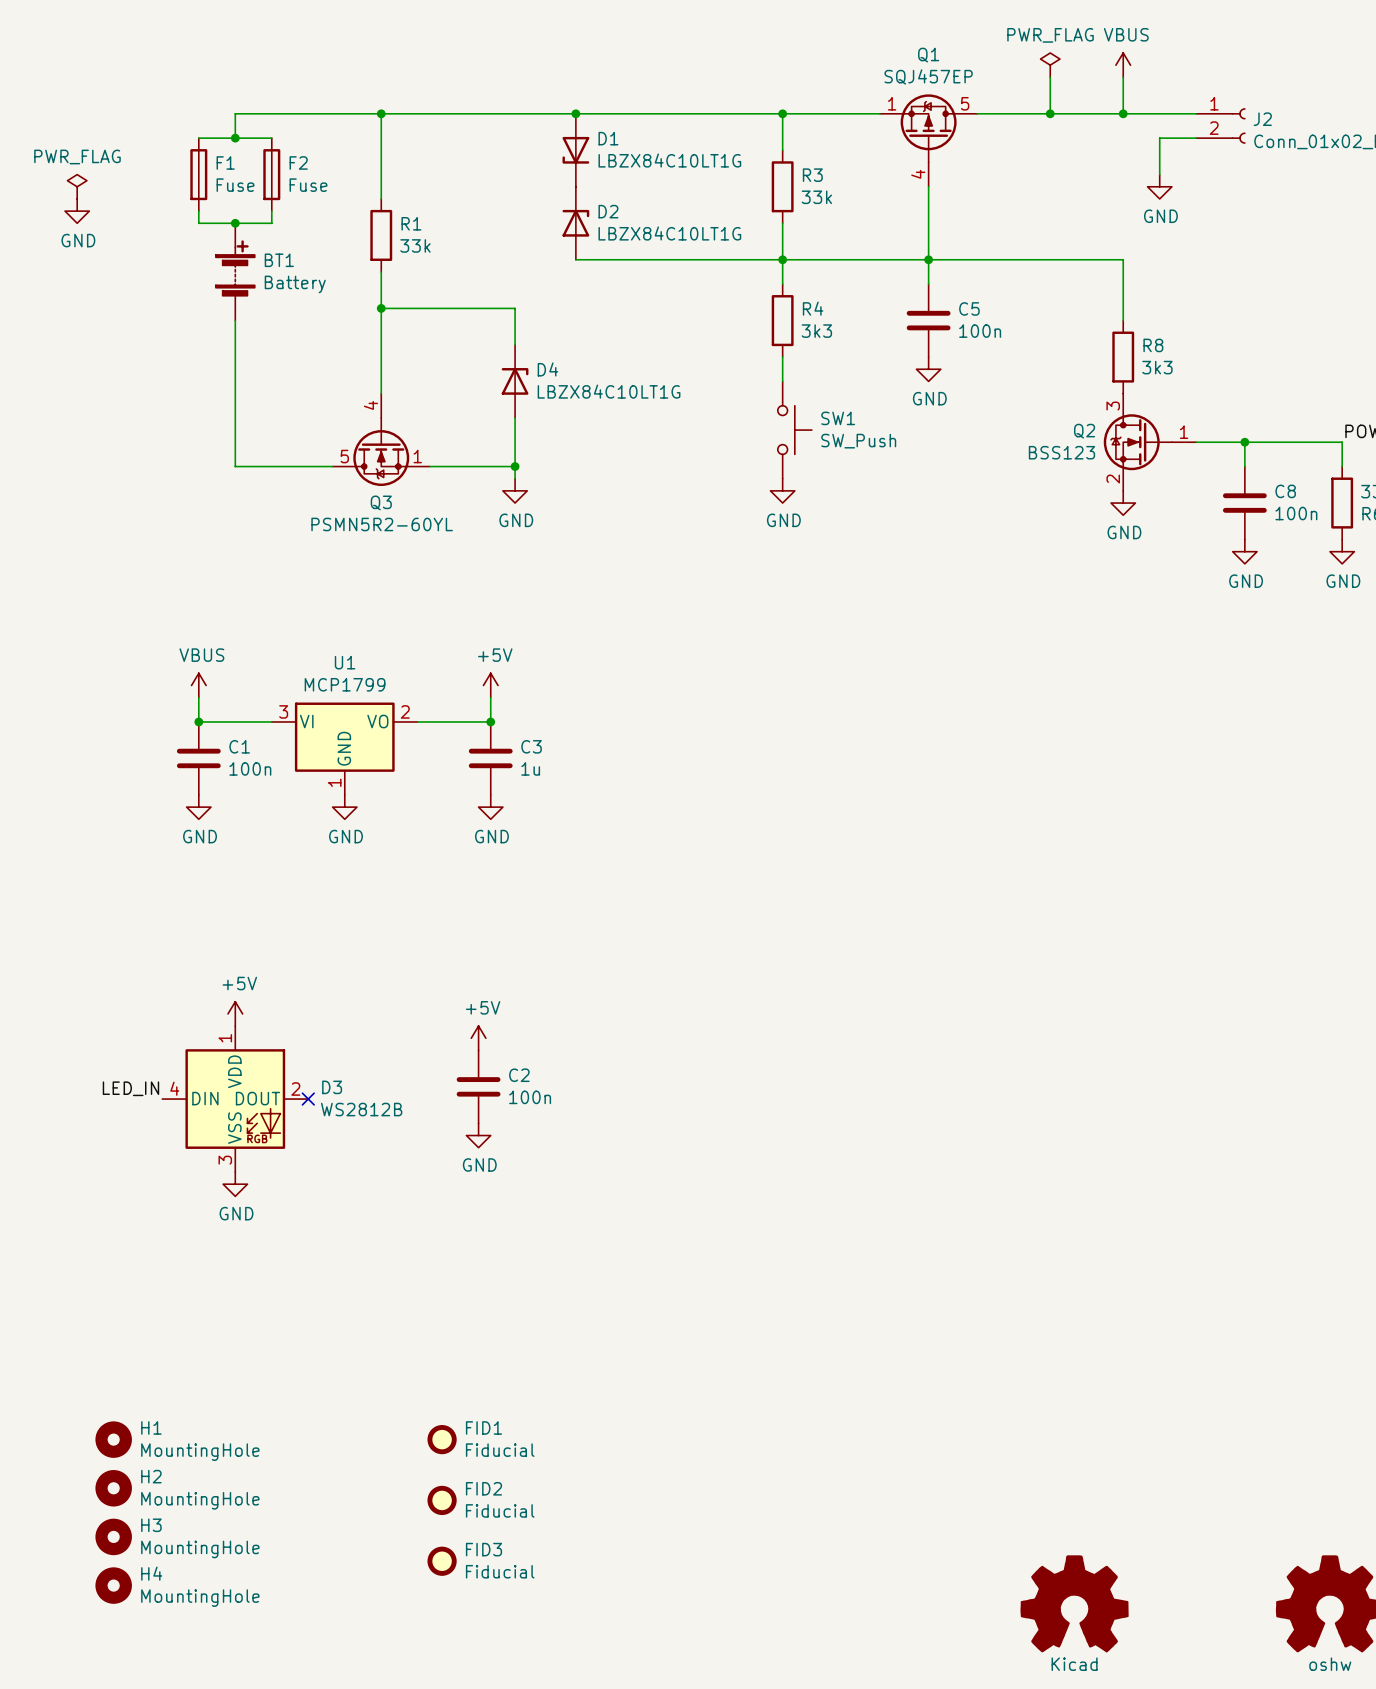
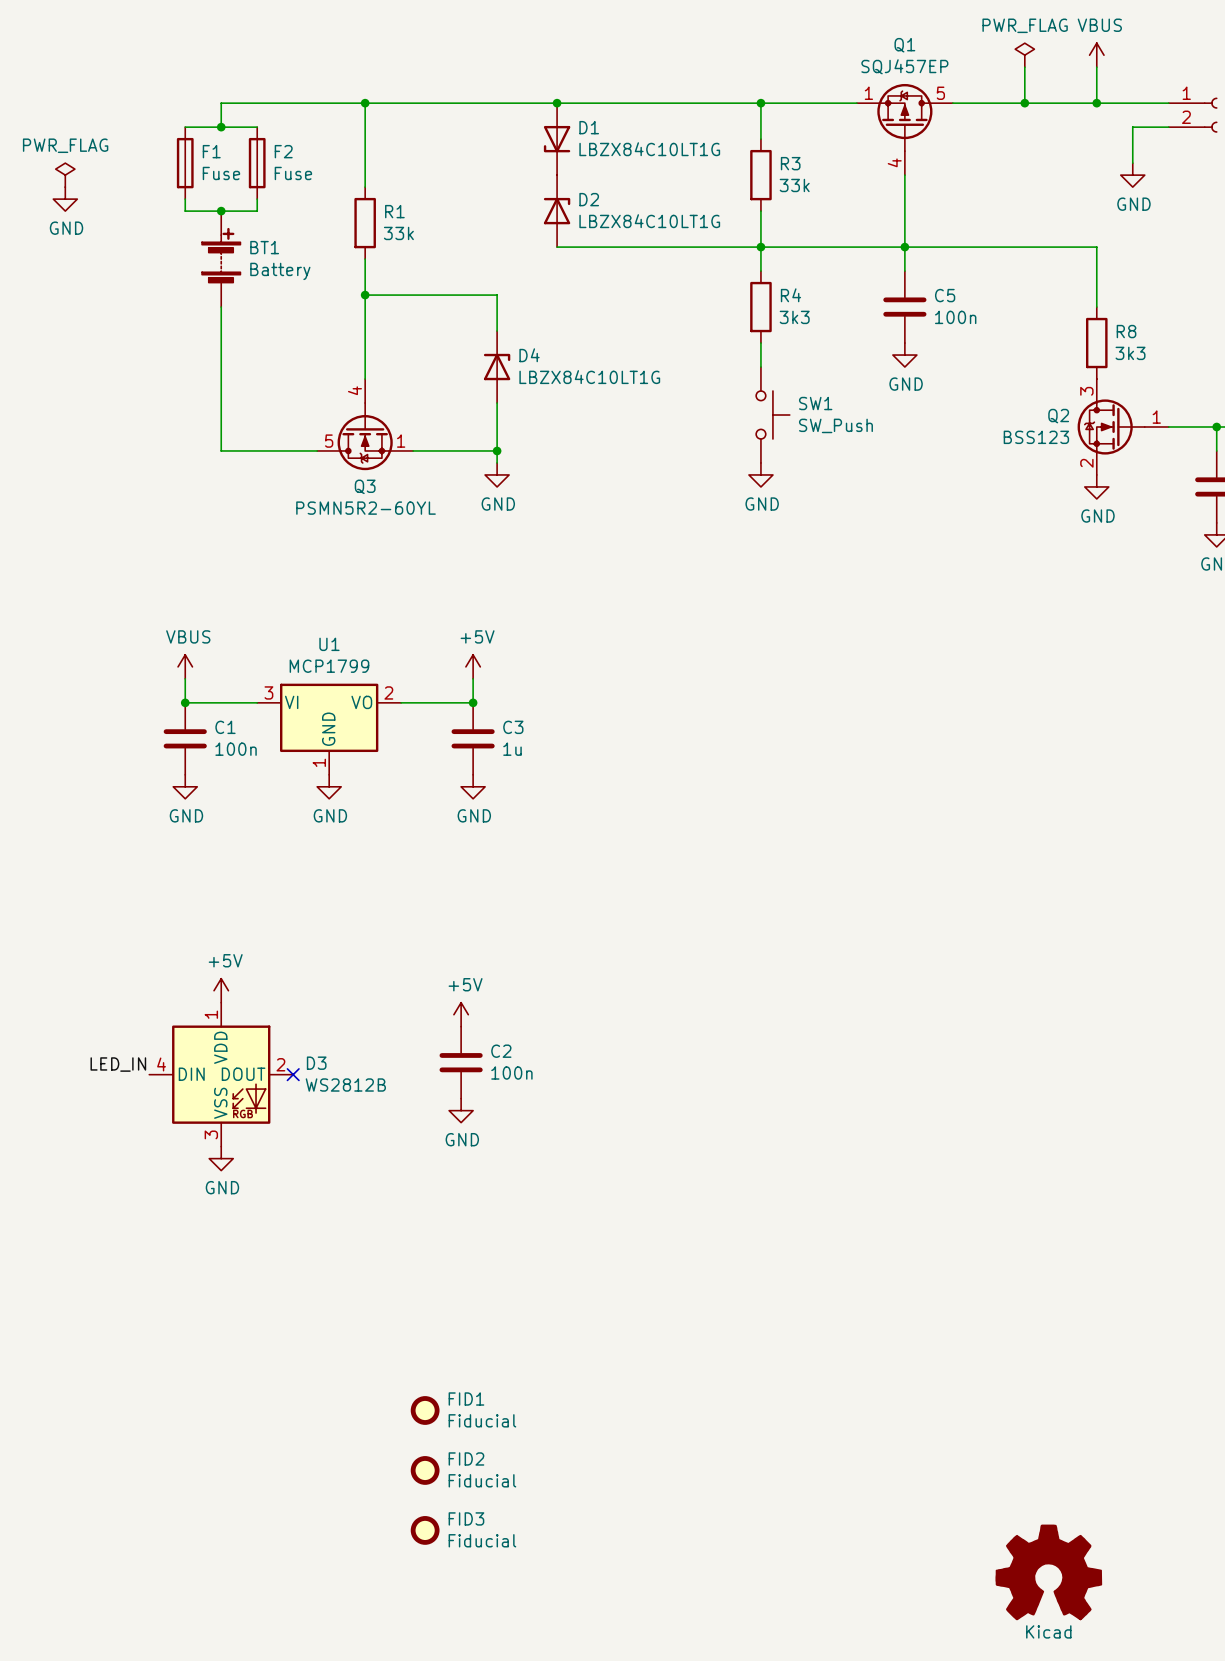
H1: MountingHole (113, 1439) -> none
H2: MountingHole (113, 1488) -> none
H3: MountingHole (113, 1536) -> none
H4: MountingHole (113, 1585) -> none

